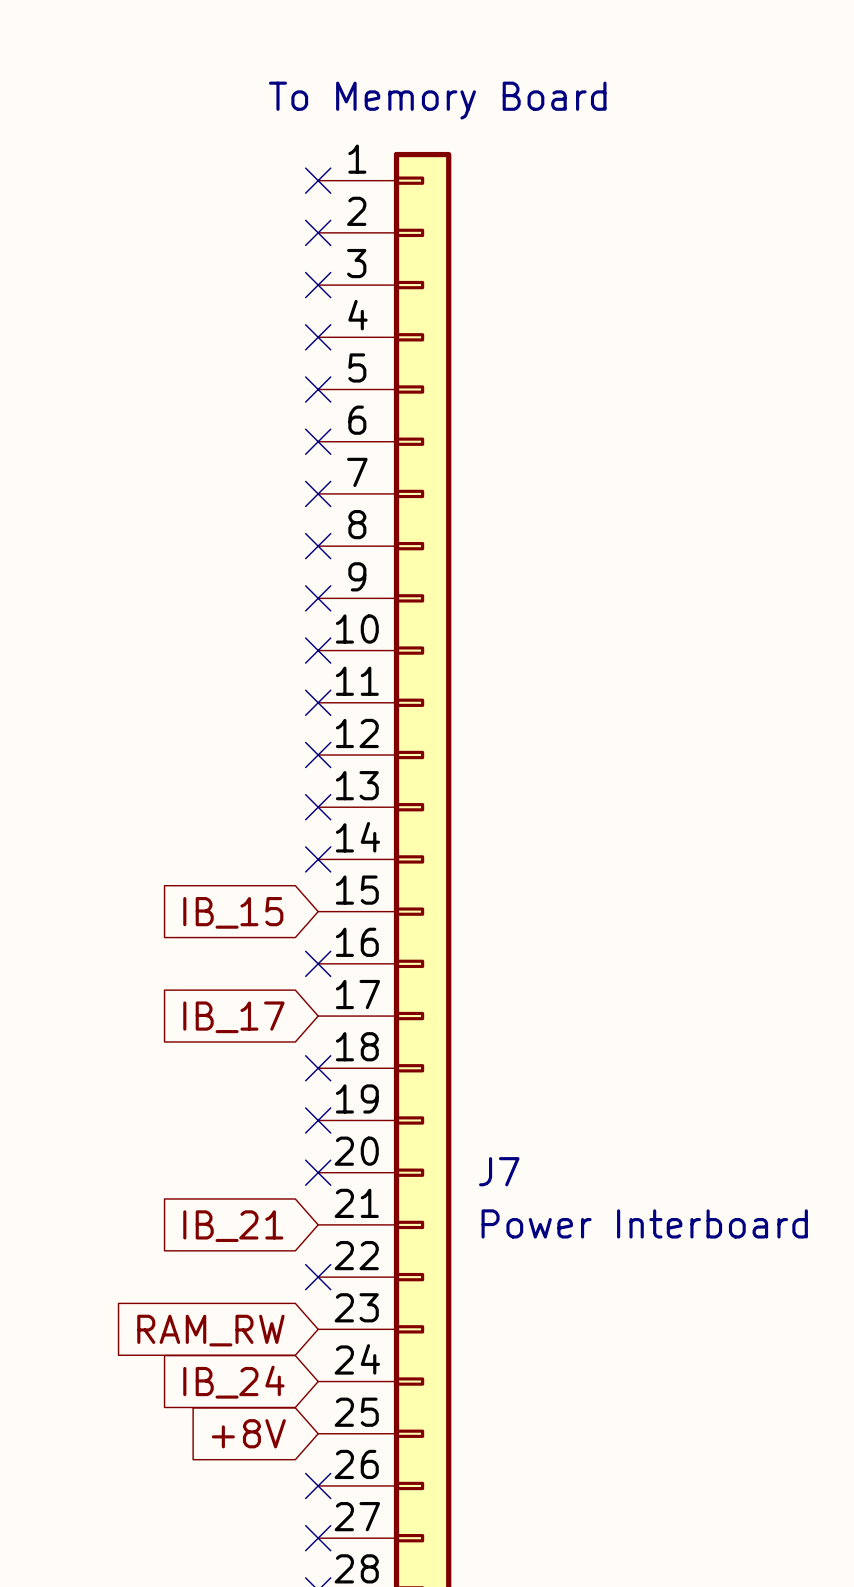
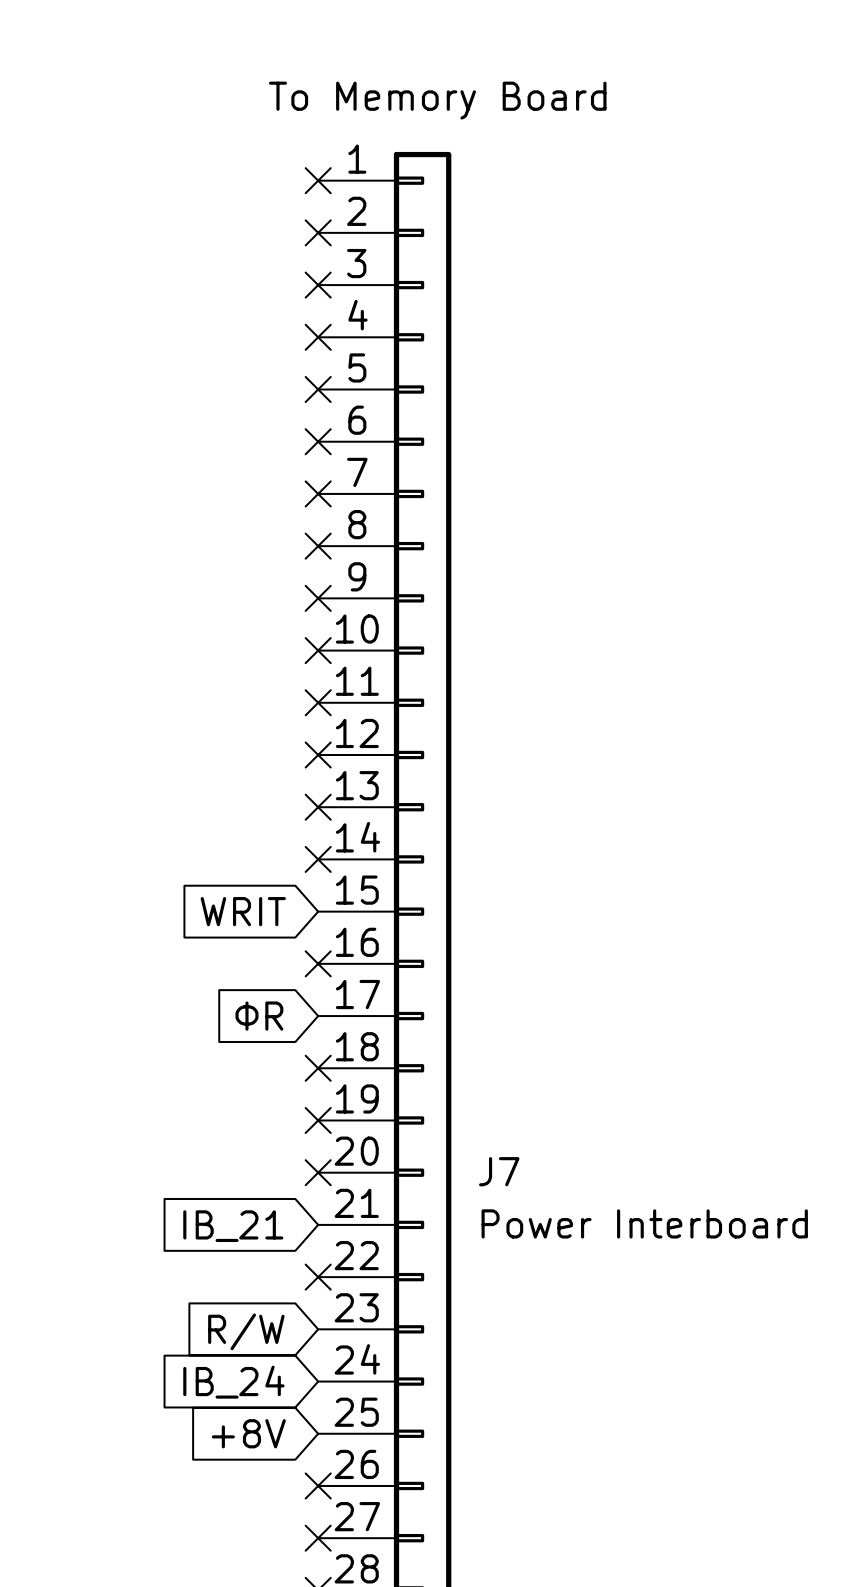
global label: IB_15 (233, 912) -> WRIT (243, 911)
global label: IB_17 (233, 1017) -> ΦR (259, 1016)
global label: RAM_RW (210, 1330) -> R/W (246, 1331)

